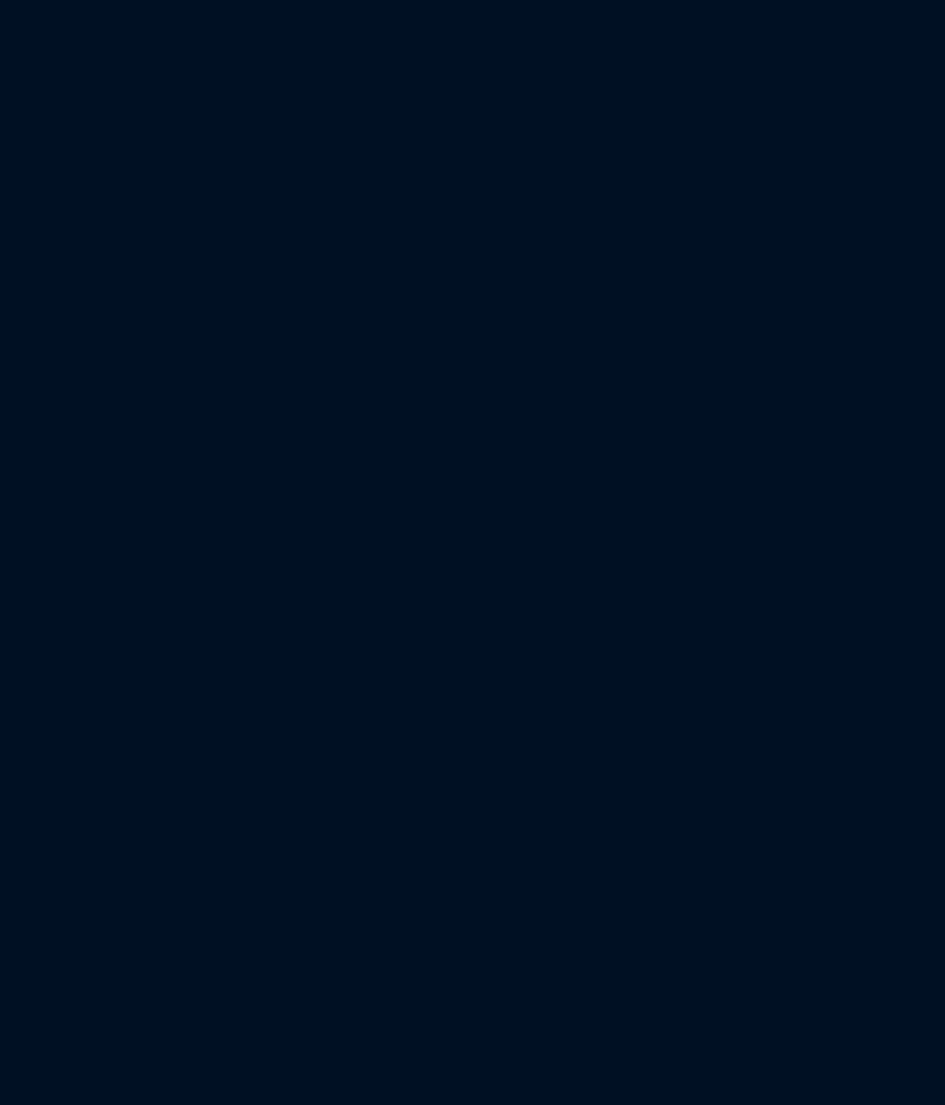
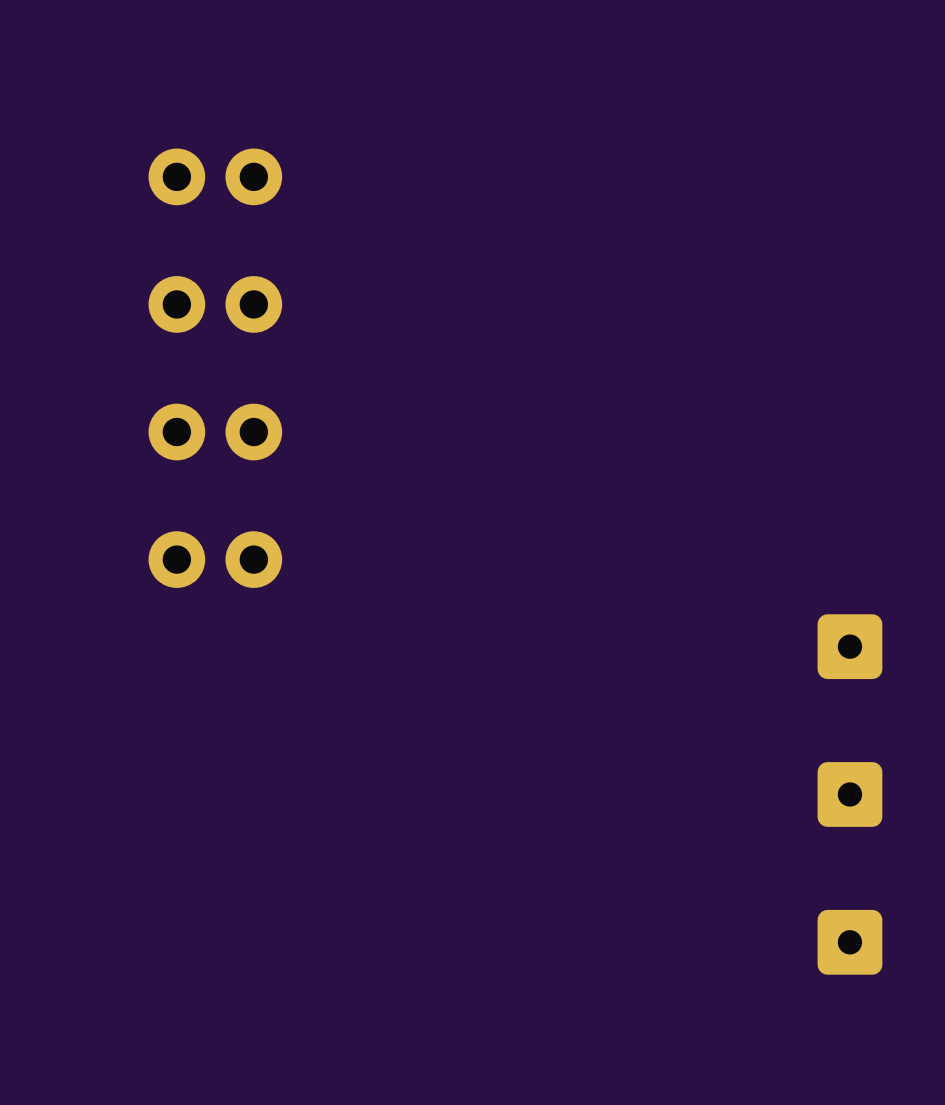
part: none -> (215, 176)
part: none -> (215, 304)
part: none -> (215, 432)
part: none -> (215, 559)
part: none -> (849, 646)
part: none -> (849, 794)
part: none -> (849, 942)

